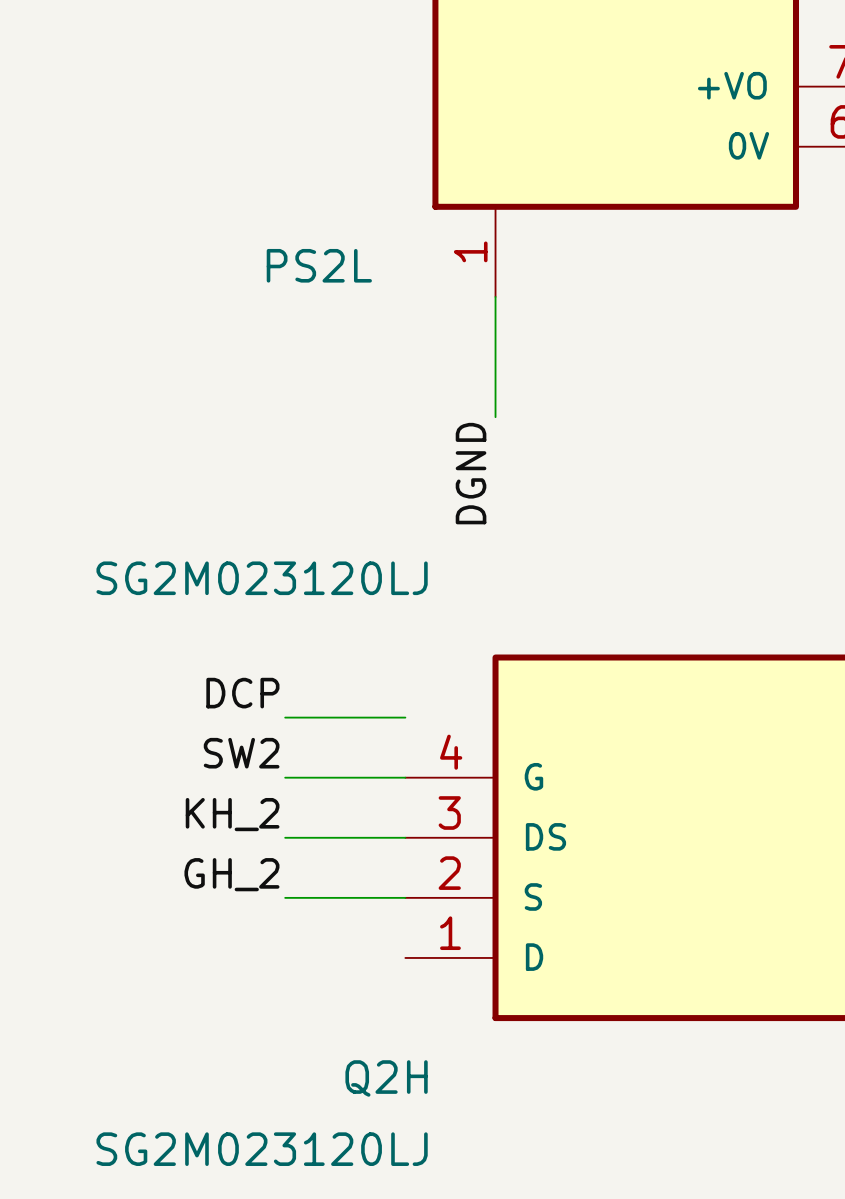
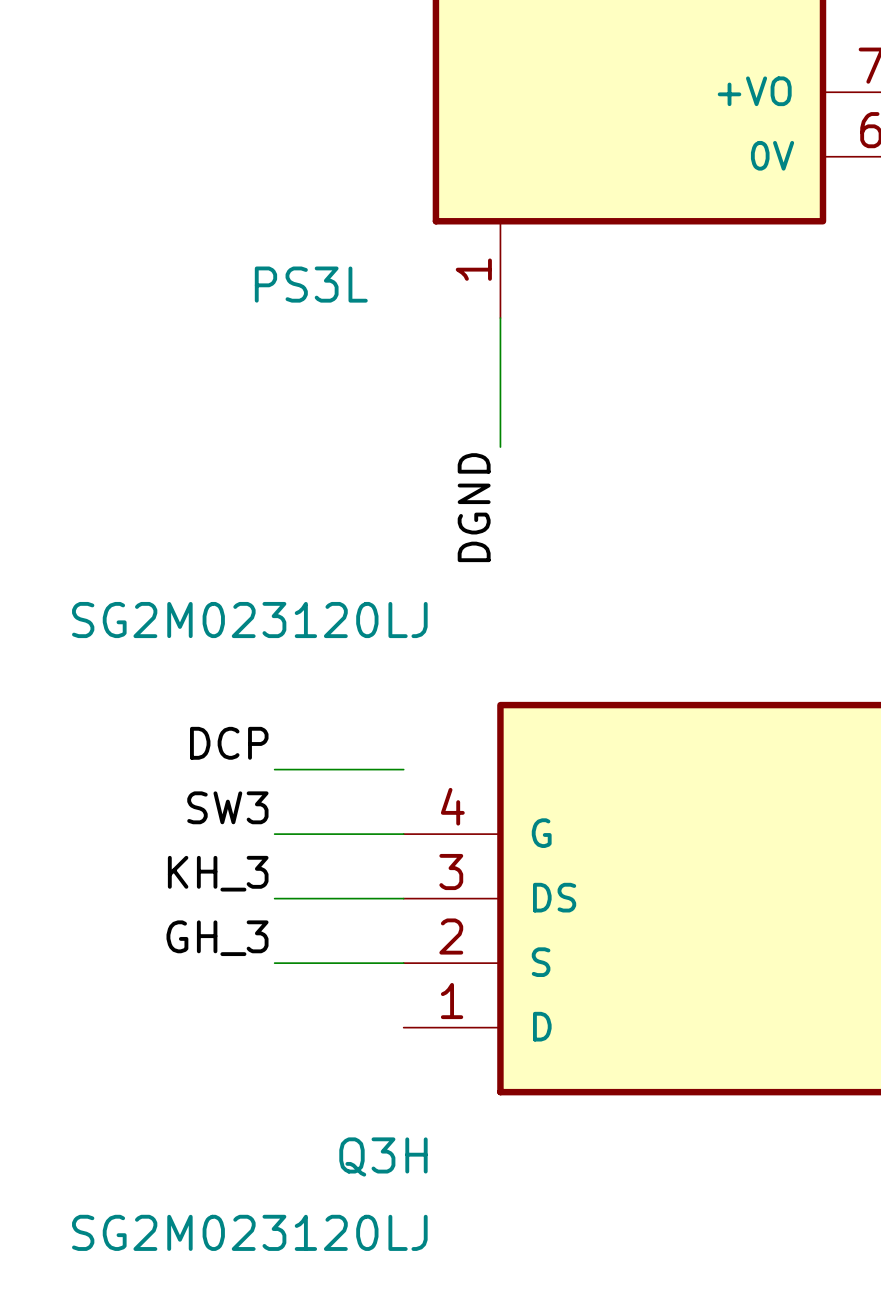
PS2L name: PS2L (319, 265) -> PS3L (311, 284)
label: SW2 (241, 753) -> SW3 (227, 807)
label: KH_2 (232, 814) -> KH_3 (218, 873)
label: GH_2 (231, 874) -> GH_3 (217, 938)
Q2H name: Q2H (386, 1078) -> Q3H (383, 1156)

